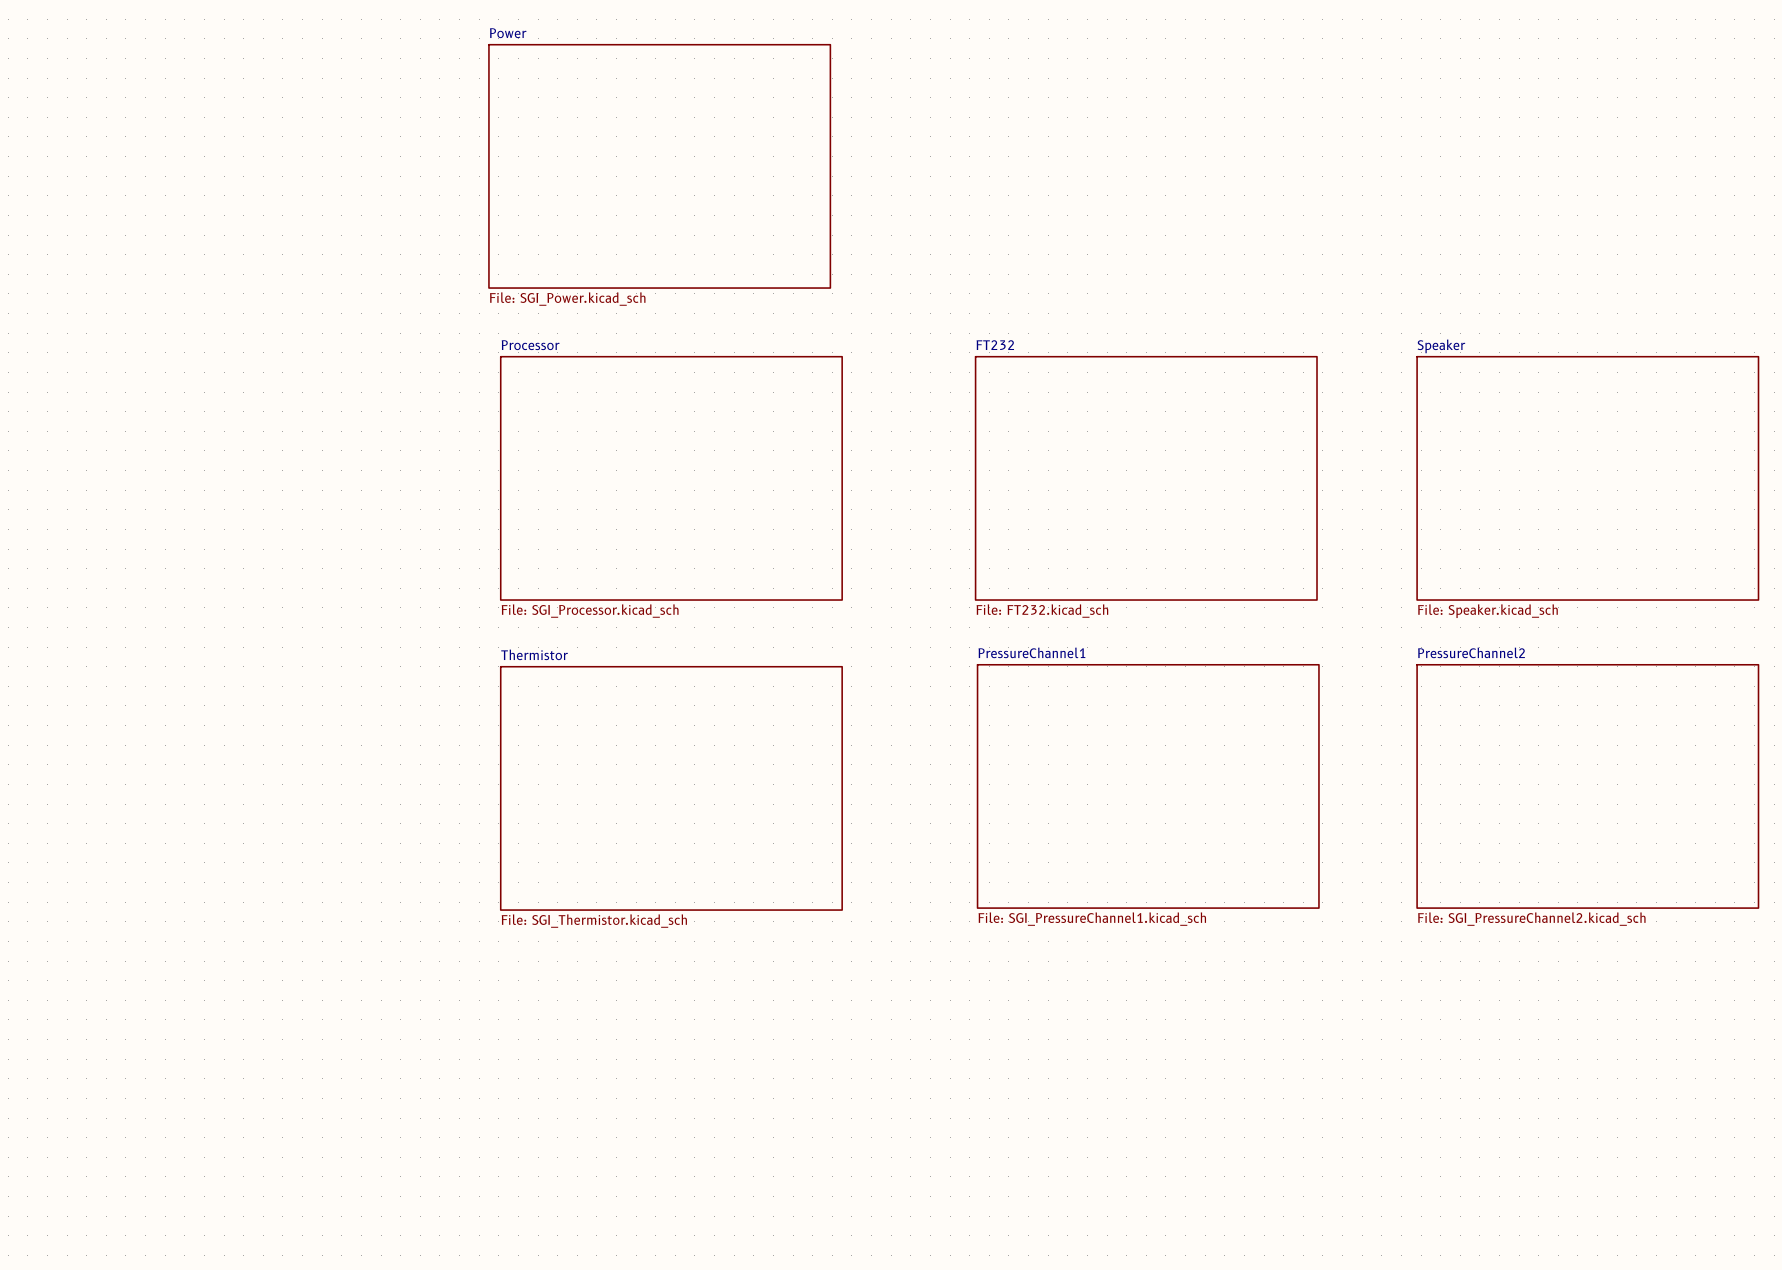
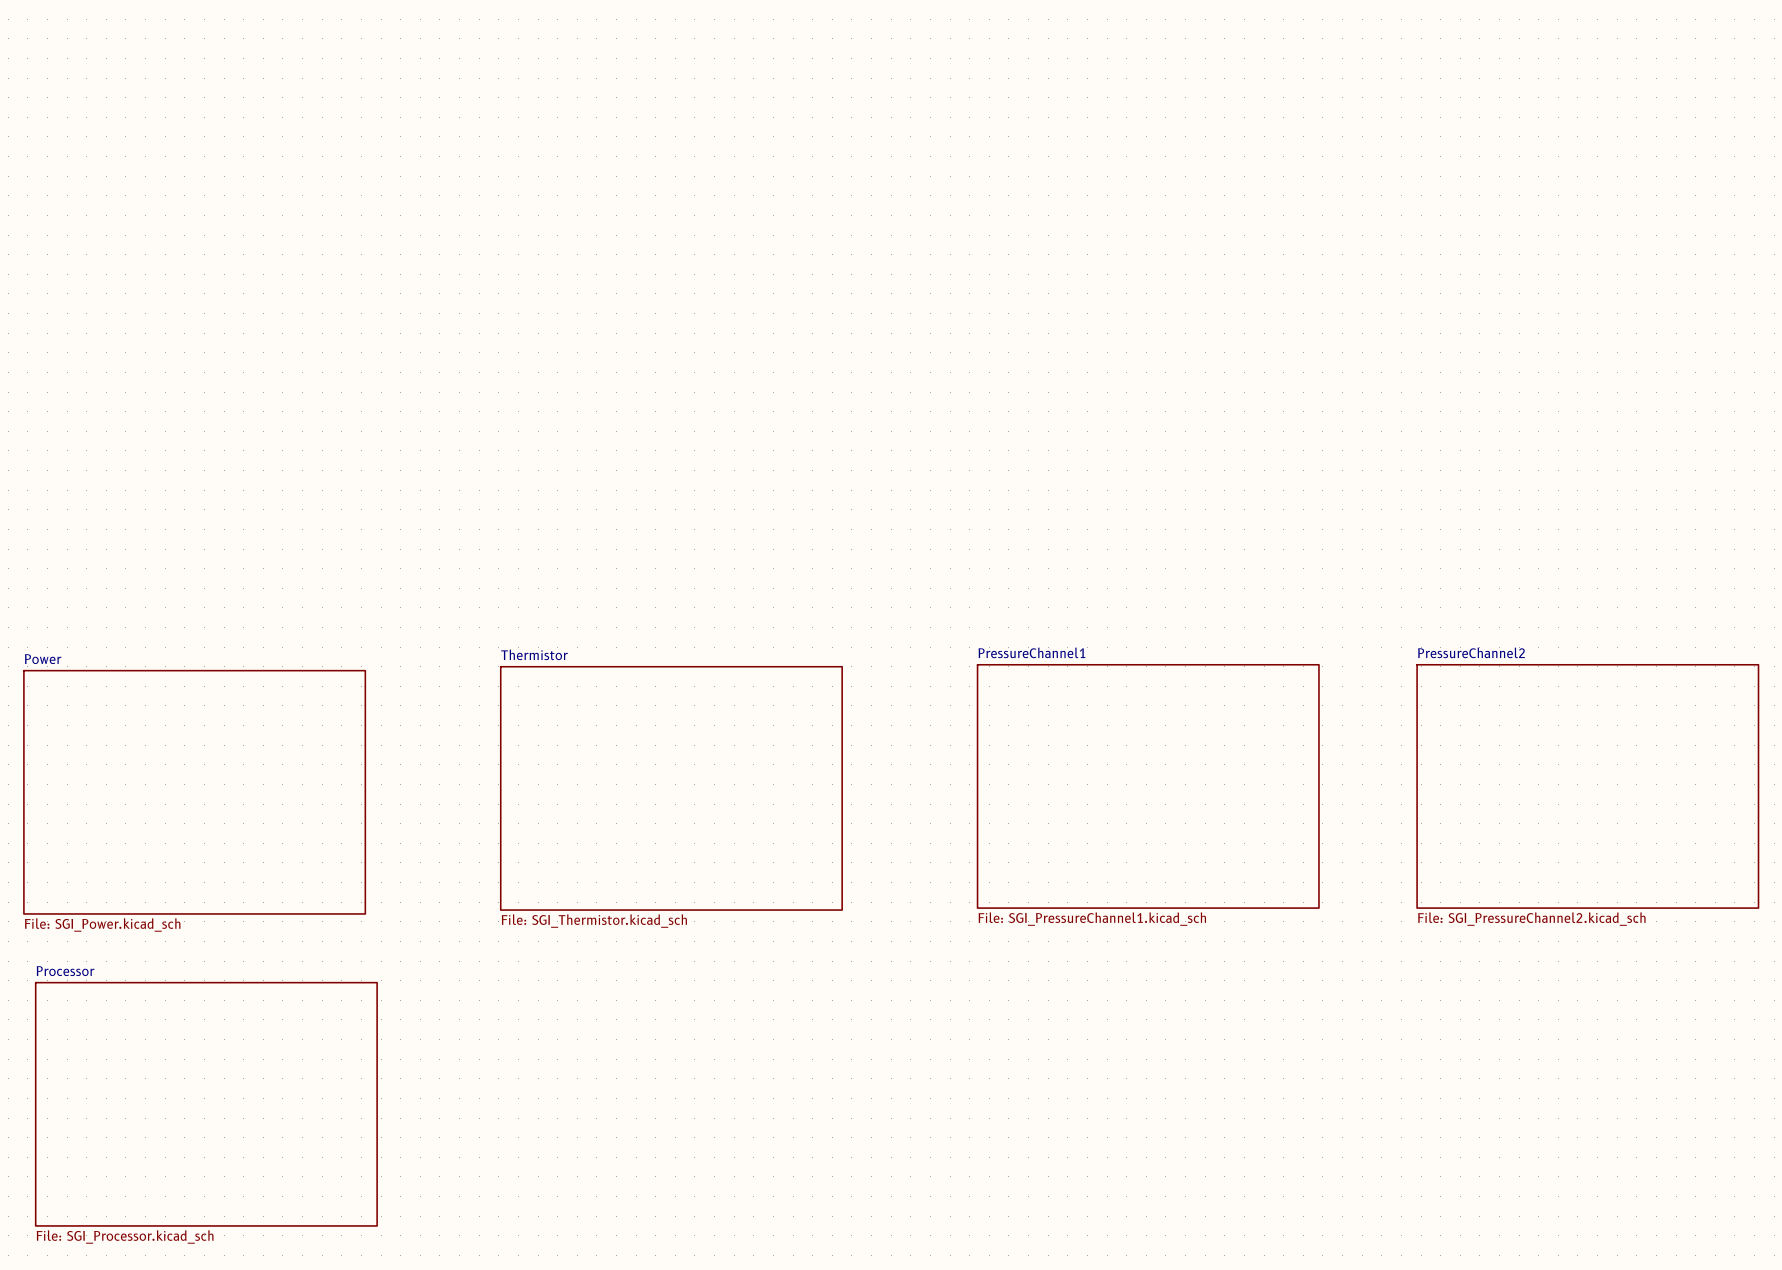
sheet Power: File: SGI_Power.kicad_sch (659, 166) -> none
sheet Processor: File: SGI_Processor.kicad_sch (671, 478) -> none
sheet FT232: File: FT232.kicad_sch (1146, 478) -> none
sheet Speaker: File: Speaker.kicad_sch (1587, 478) -> none
sheet Power: none -> File: SGI_Power.kicad_sch (194, 792)
sheet Processor: none -> File: SGI_Processor.kicad_sch (206, 1104)

